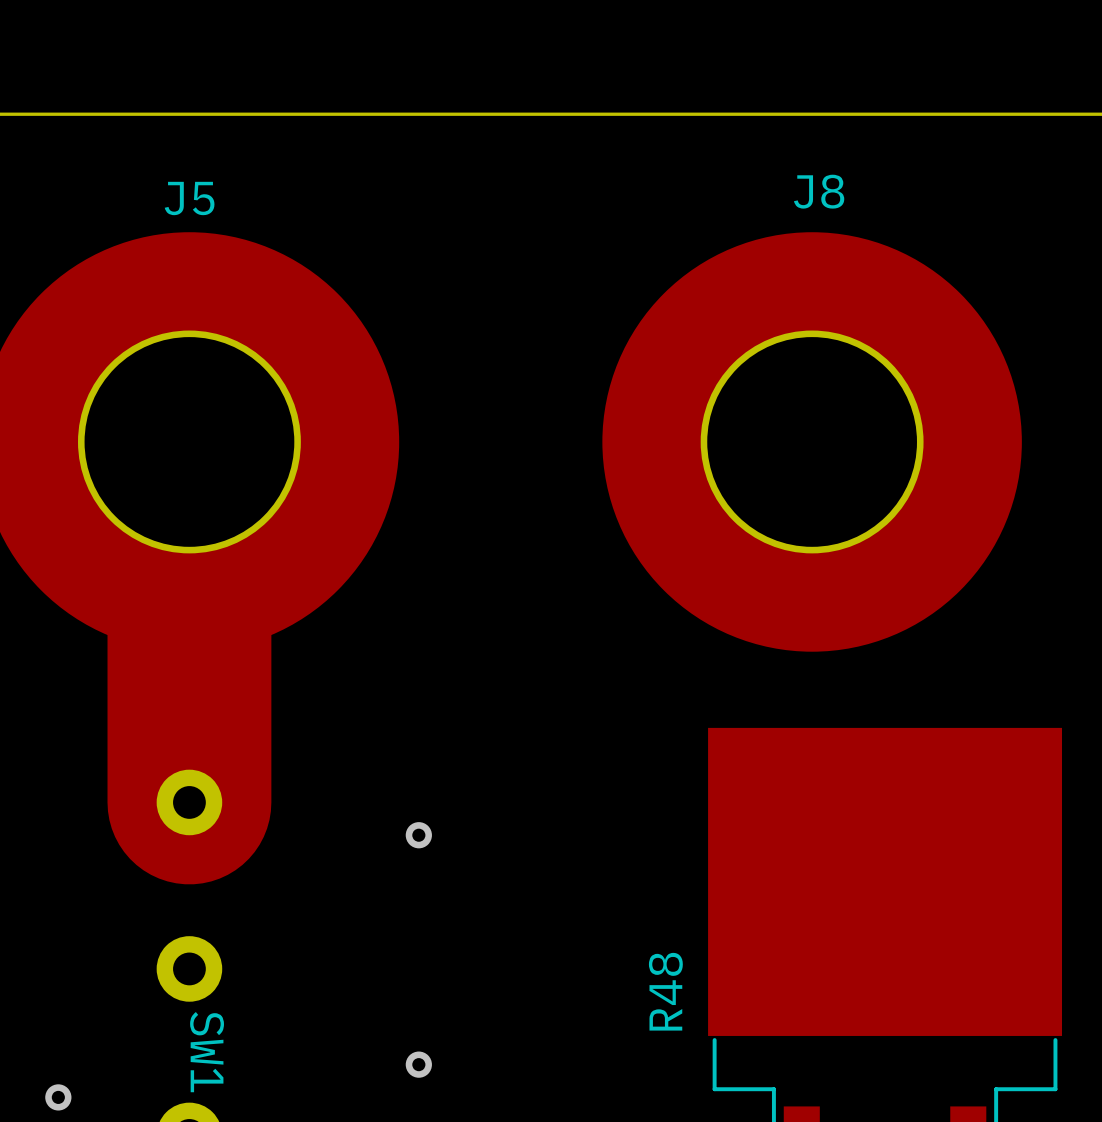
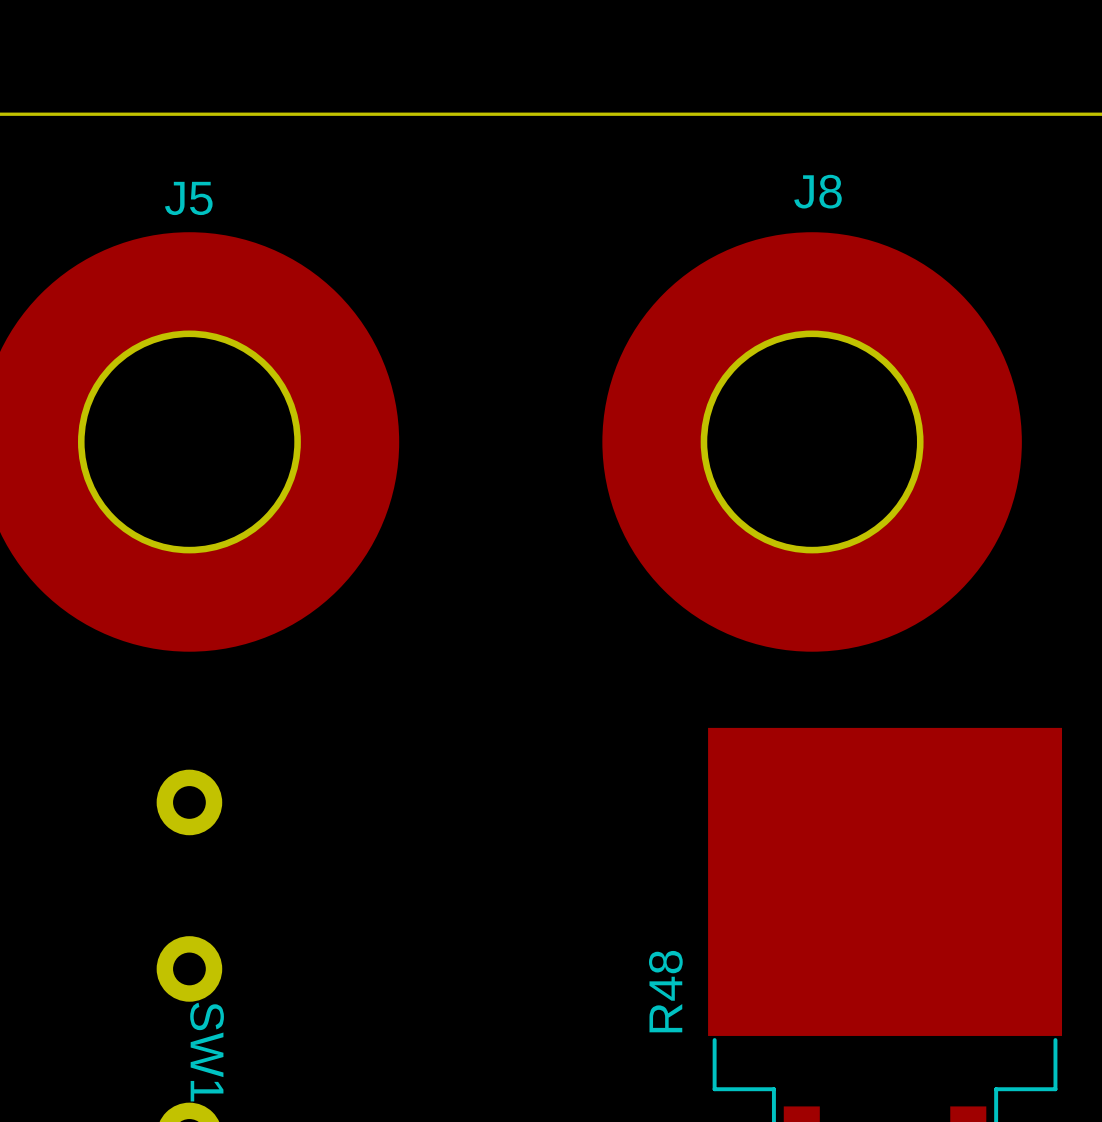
track: (189, 441) (189, 802) -> none
via: (418, 835) -> none
via: (418, 1064) -> none
via: (58, 1097) -> none

